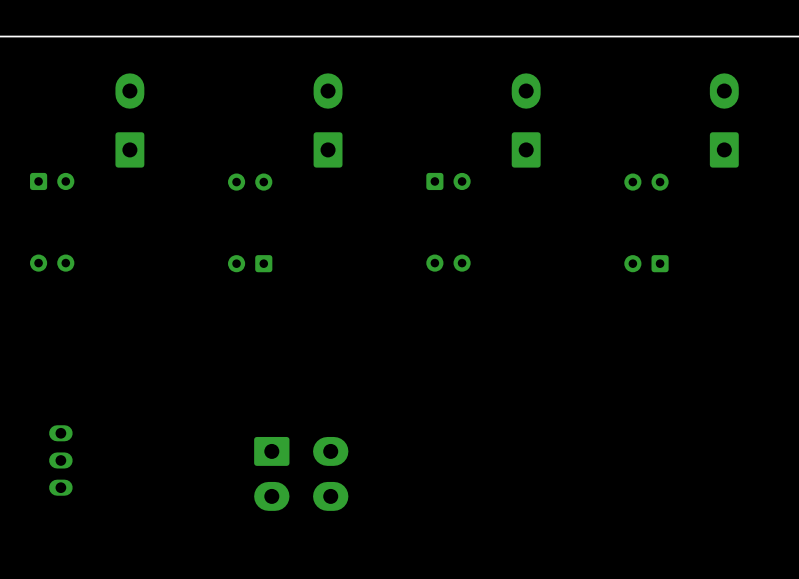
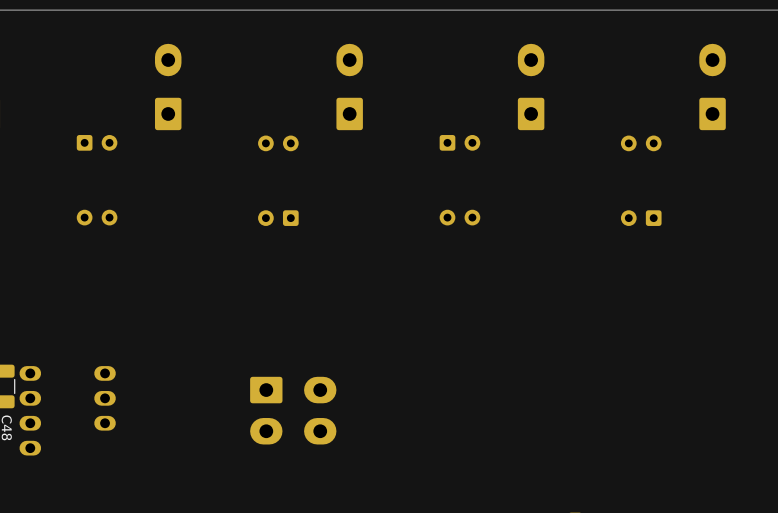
part position: (301, 473) -> (293, 410)

